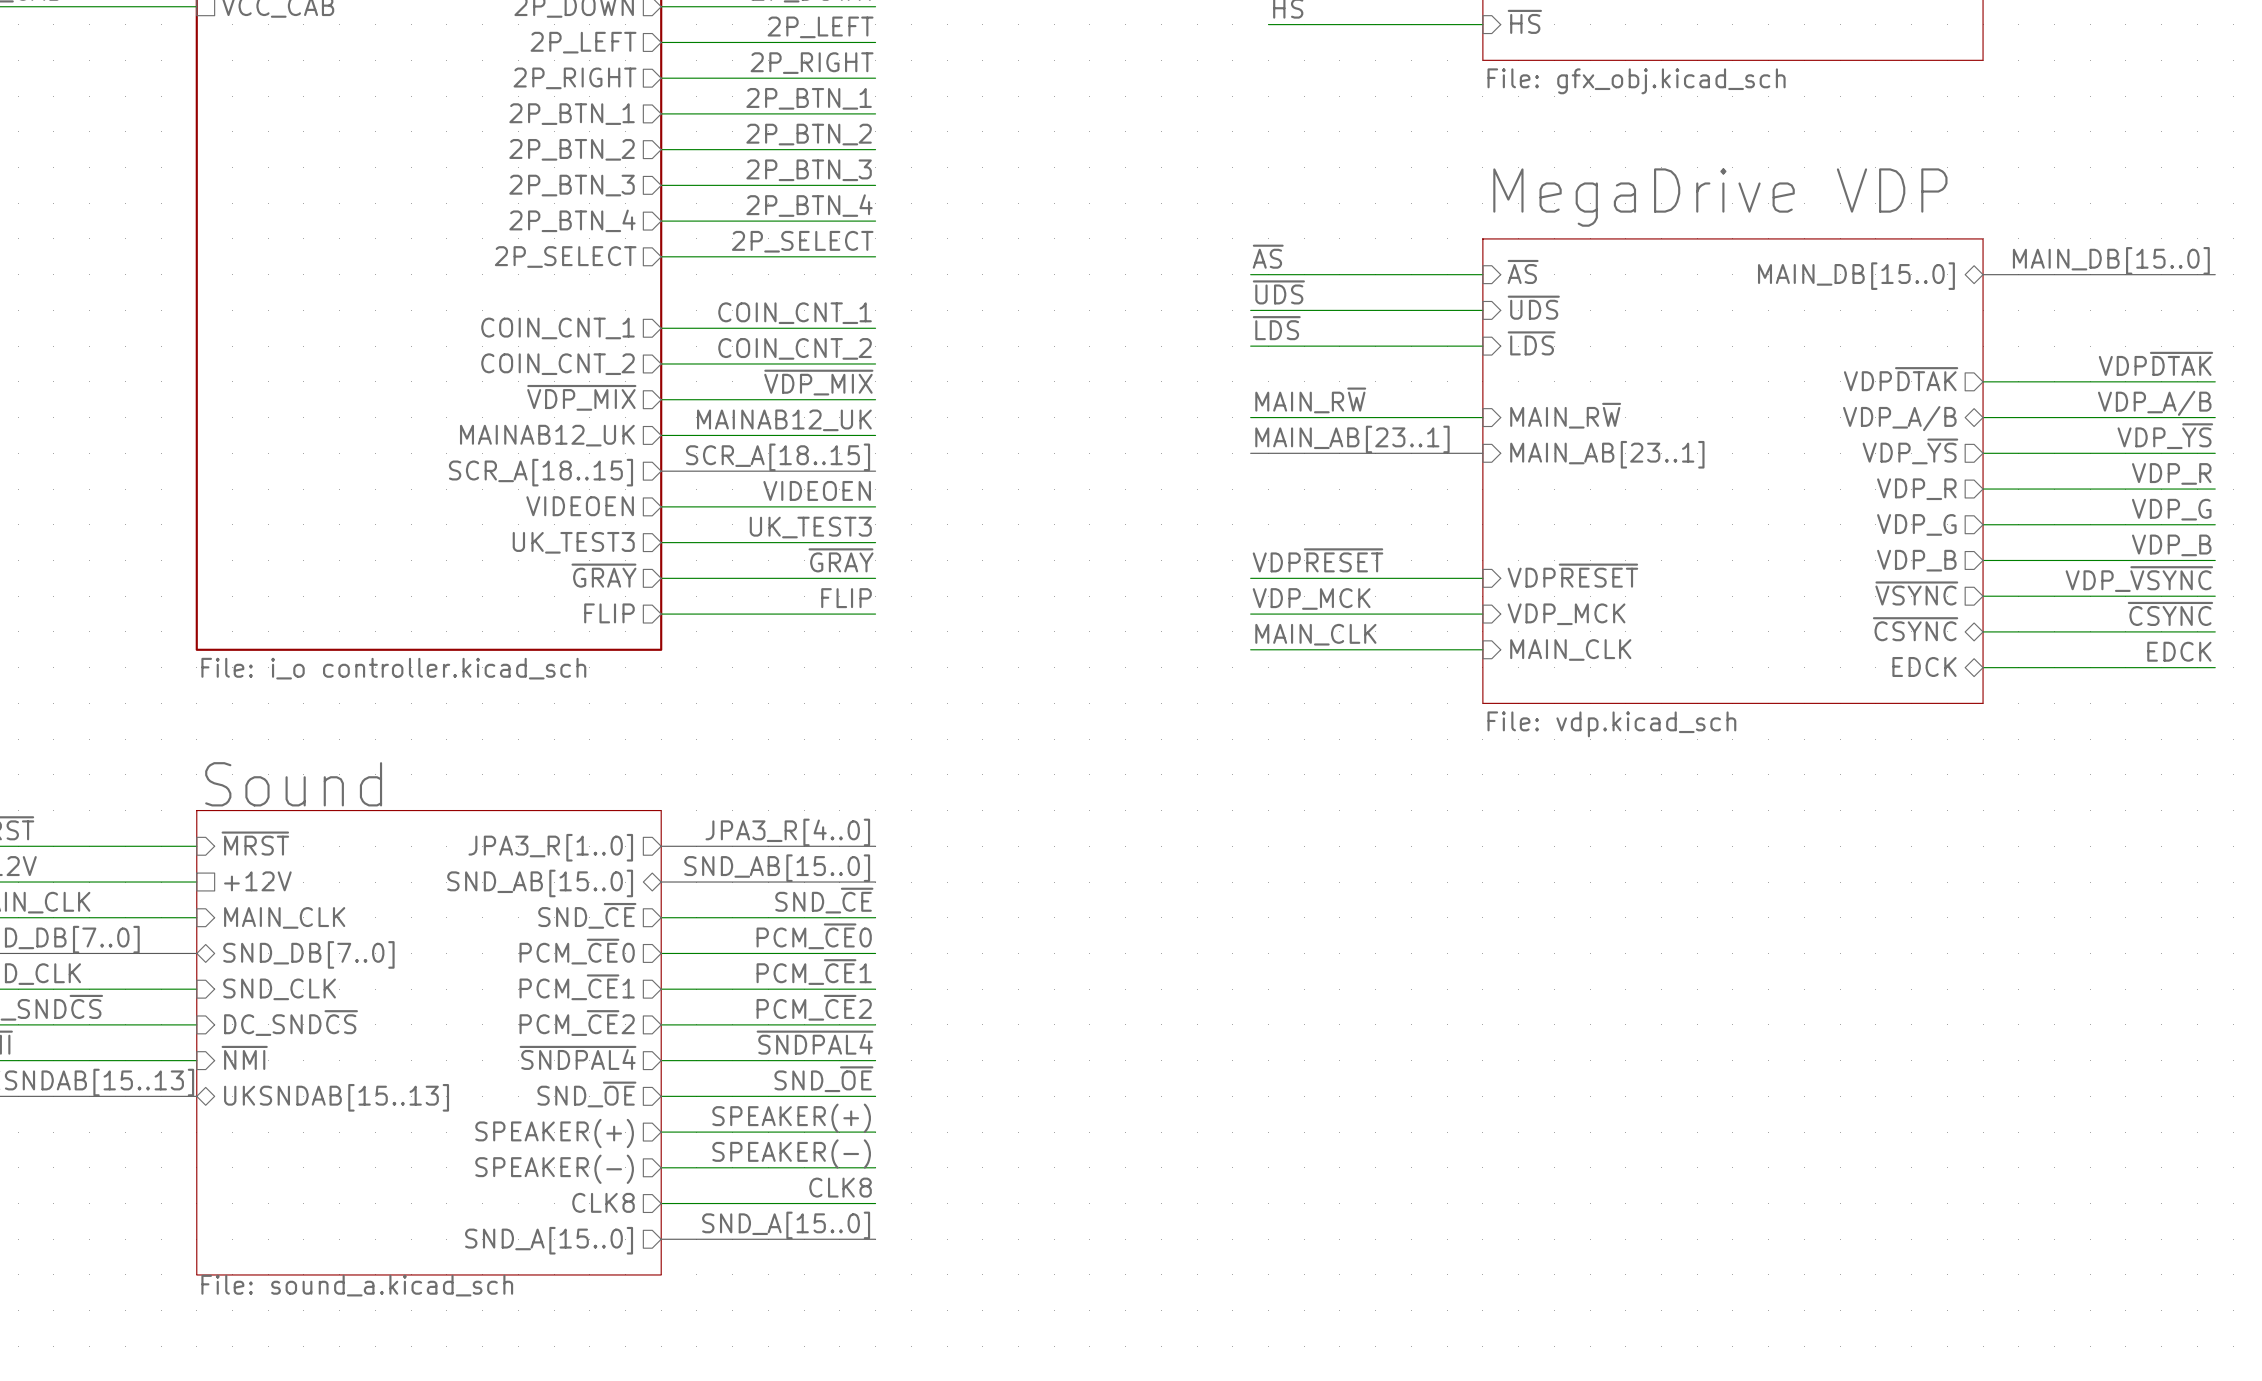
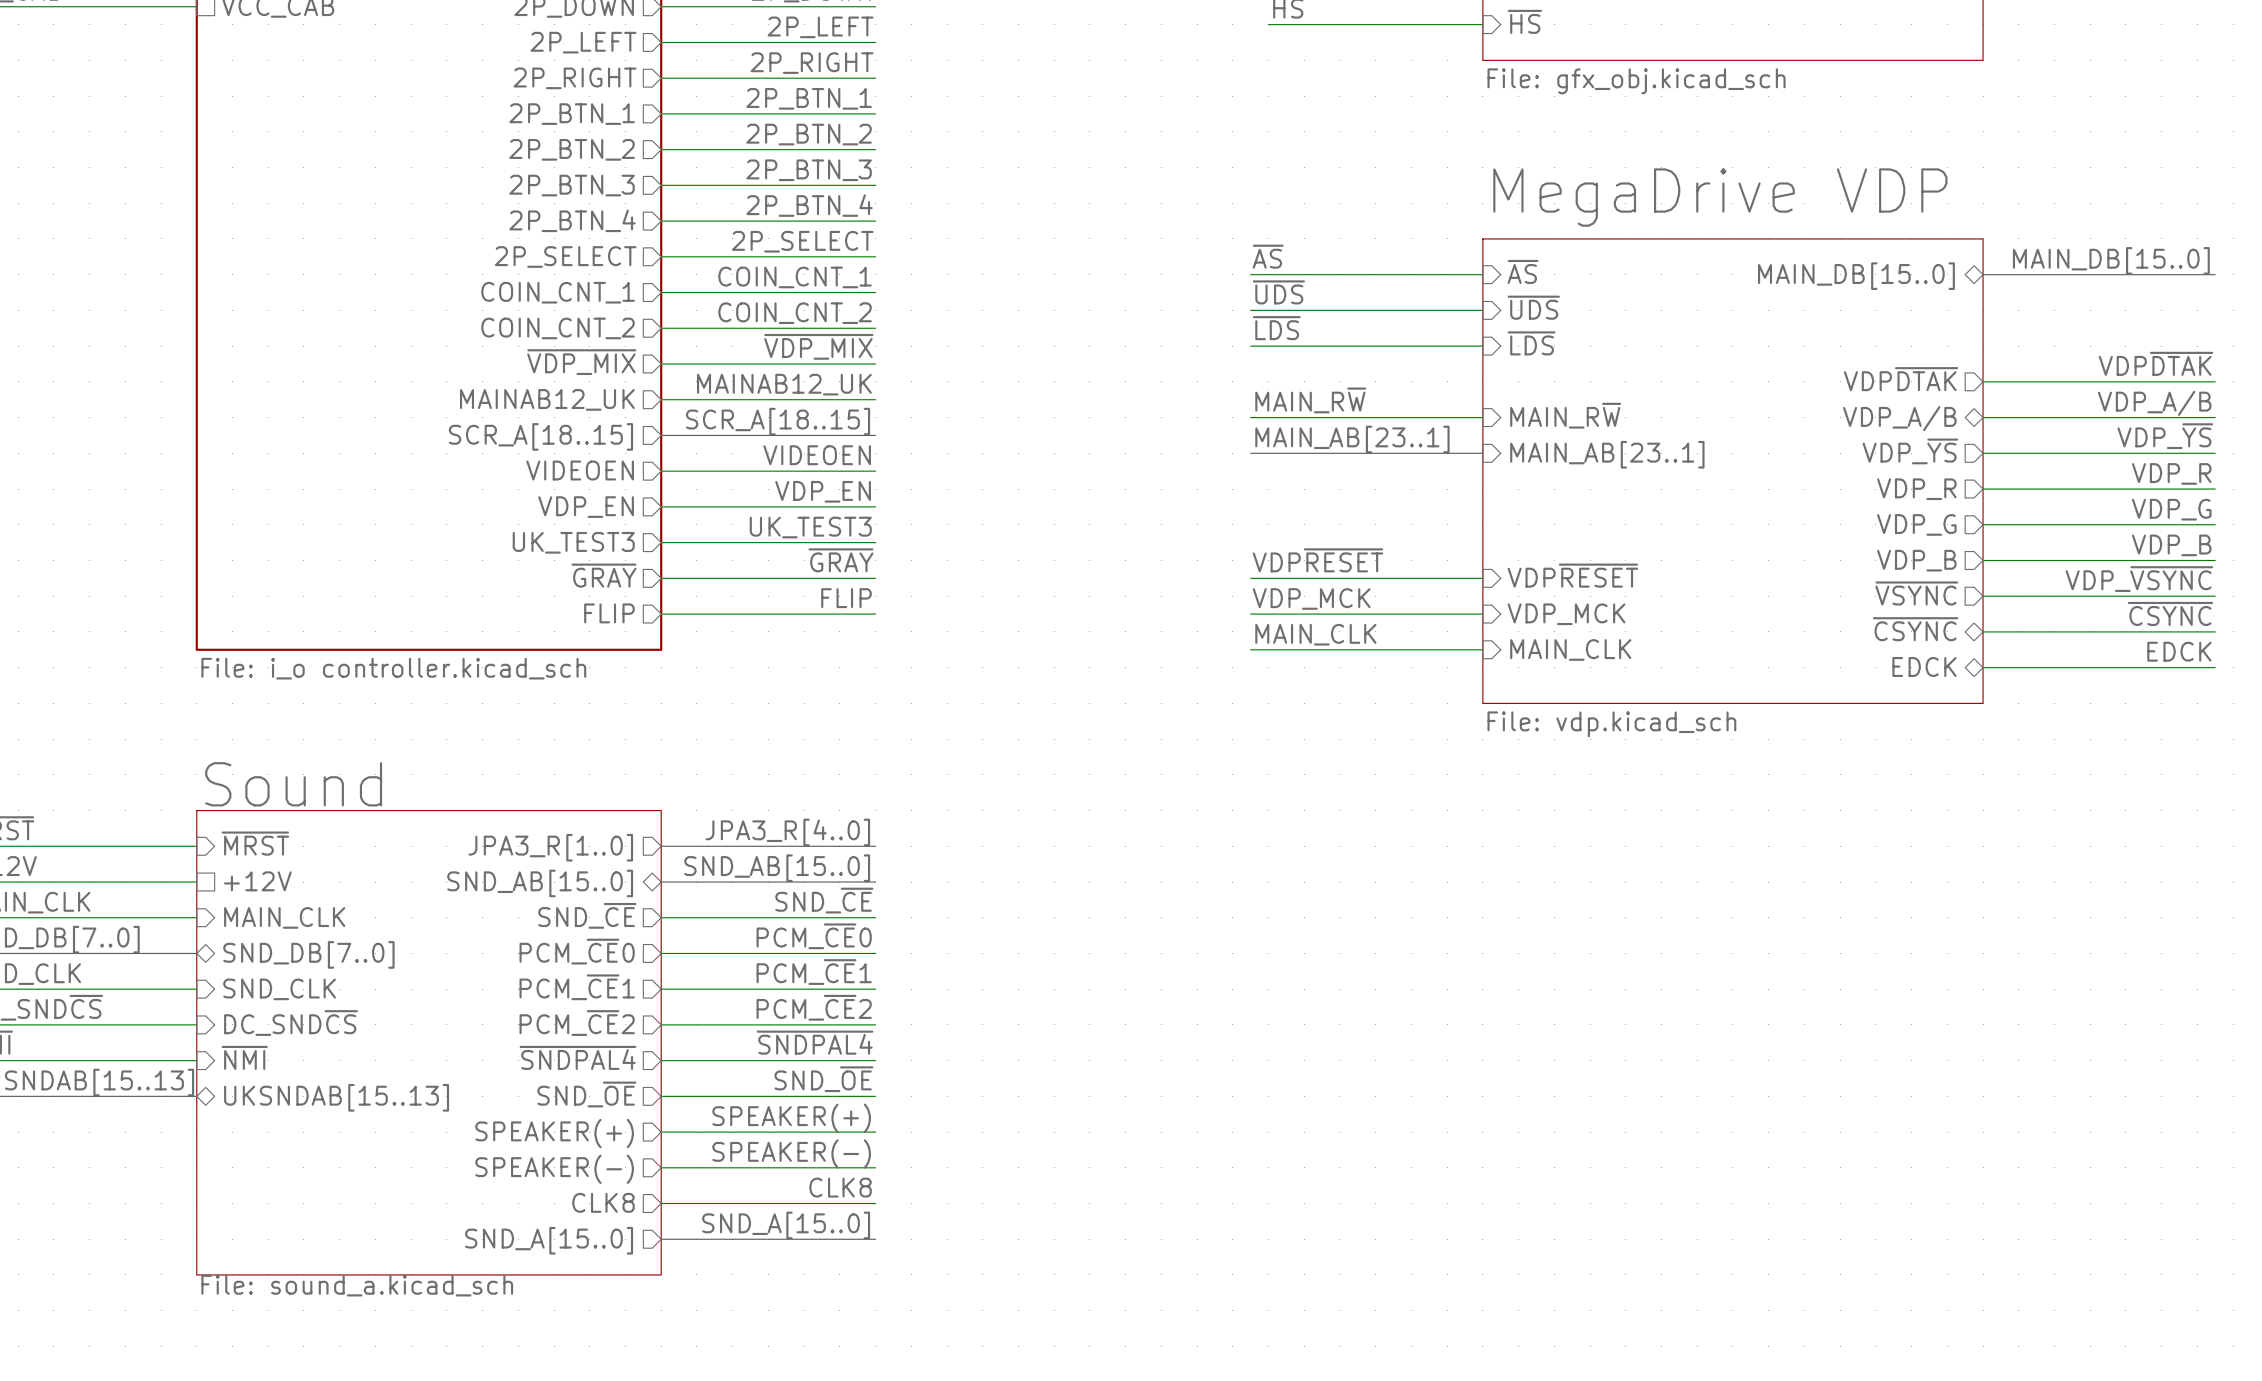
label: none -> COIN_CNT_1 (795, 277)
sheet pin: none -> COIN_CNT_1 (558, 292)
wire: none -> (661, 292) (875, 292)
label: COIN_CNT_1 (795, 313) -> COIN_CNT_2 (795, 313)
sheet pin: COIN_CNT_1 (558, 328) -> COIN_CNT_2 (558, 328)
label: COIN_CNT_2 (795, 348) -> ~{VDP_MIX} (818, 346)
sheet pin: COIN_CNT_2 (558, 364) -> ~{VDP_MIX} (581, 362)
label: ~{VDP_MIX} (818, 382) -> MAINAB12_UK (784, 384)
sheet pin: ~{VDP_MIX} (581, 397) -> MAINAB12_UK (547, 399)
label: MAINAB12_UK (784, 420) -> SCR_A[18..15] (778, 421)
sheet pin: MAINAB12_UK (547, 435) -> SCR_A[18..15] (540, 436)
label: SCR_A[18..15] (778, 457) -> VIDEOEN (817, 455)
bus: (661, 471) (875, 471) -> (661, 435) (875, 435)
sheet pin: SCR_A[18..15] (540, 472) -> VIDEOEN (580, 470)
label: VIDEOEN (817, 490) -> VDP_EN (823, 491)
sheet pin: VIDEOEN (580, 506) -> VDP_EN (586, 507)

